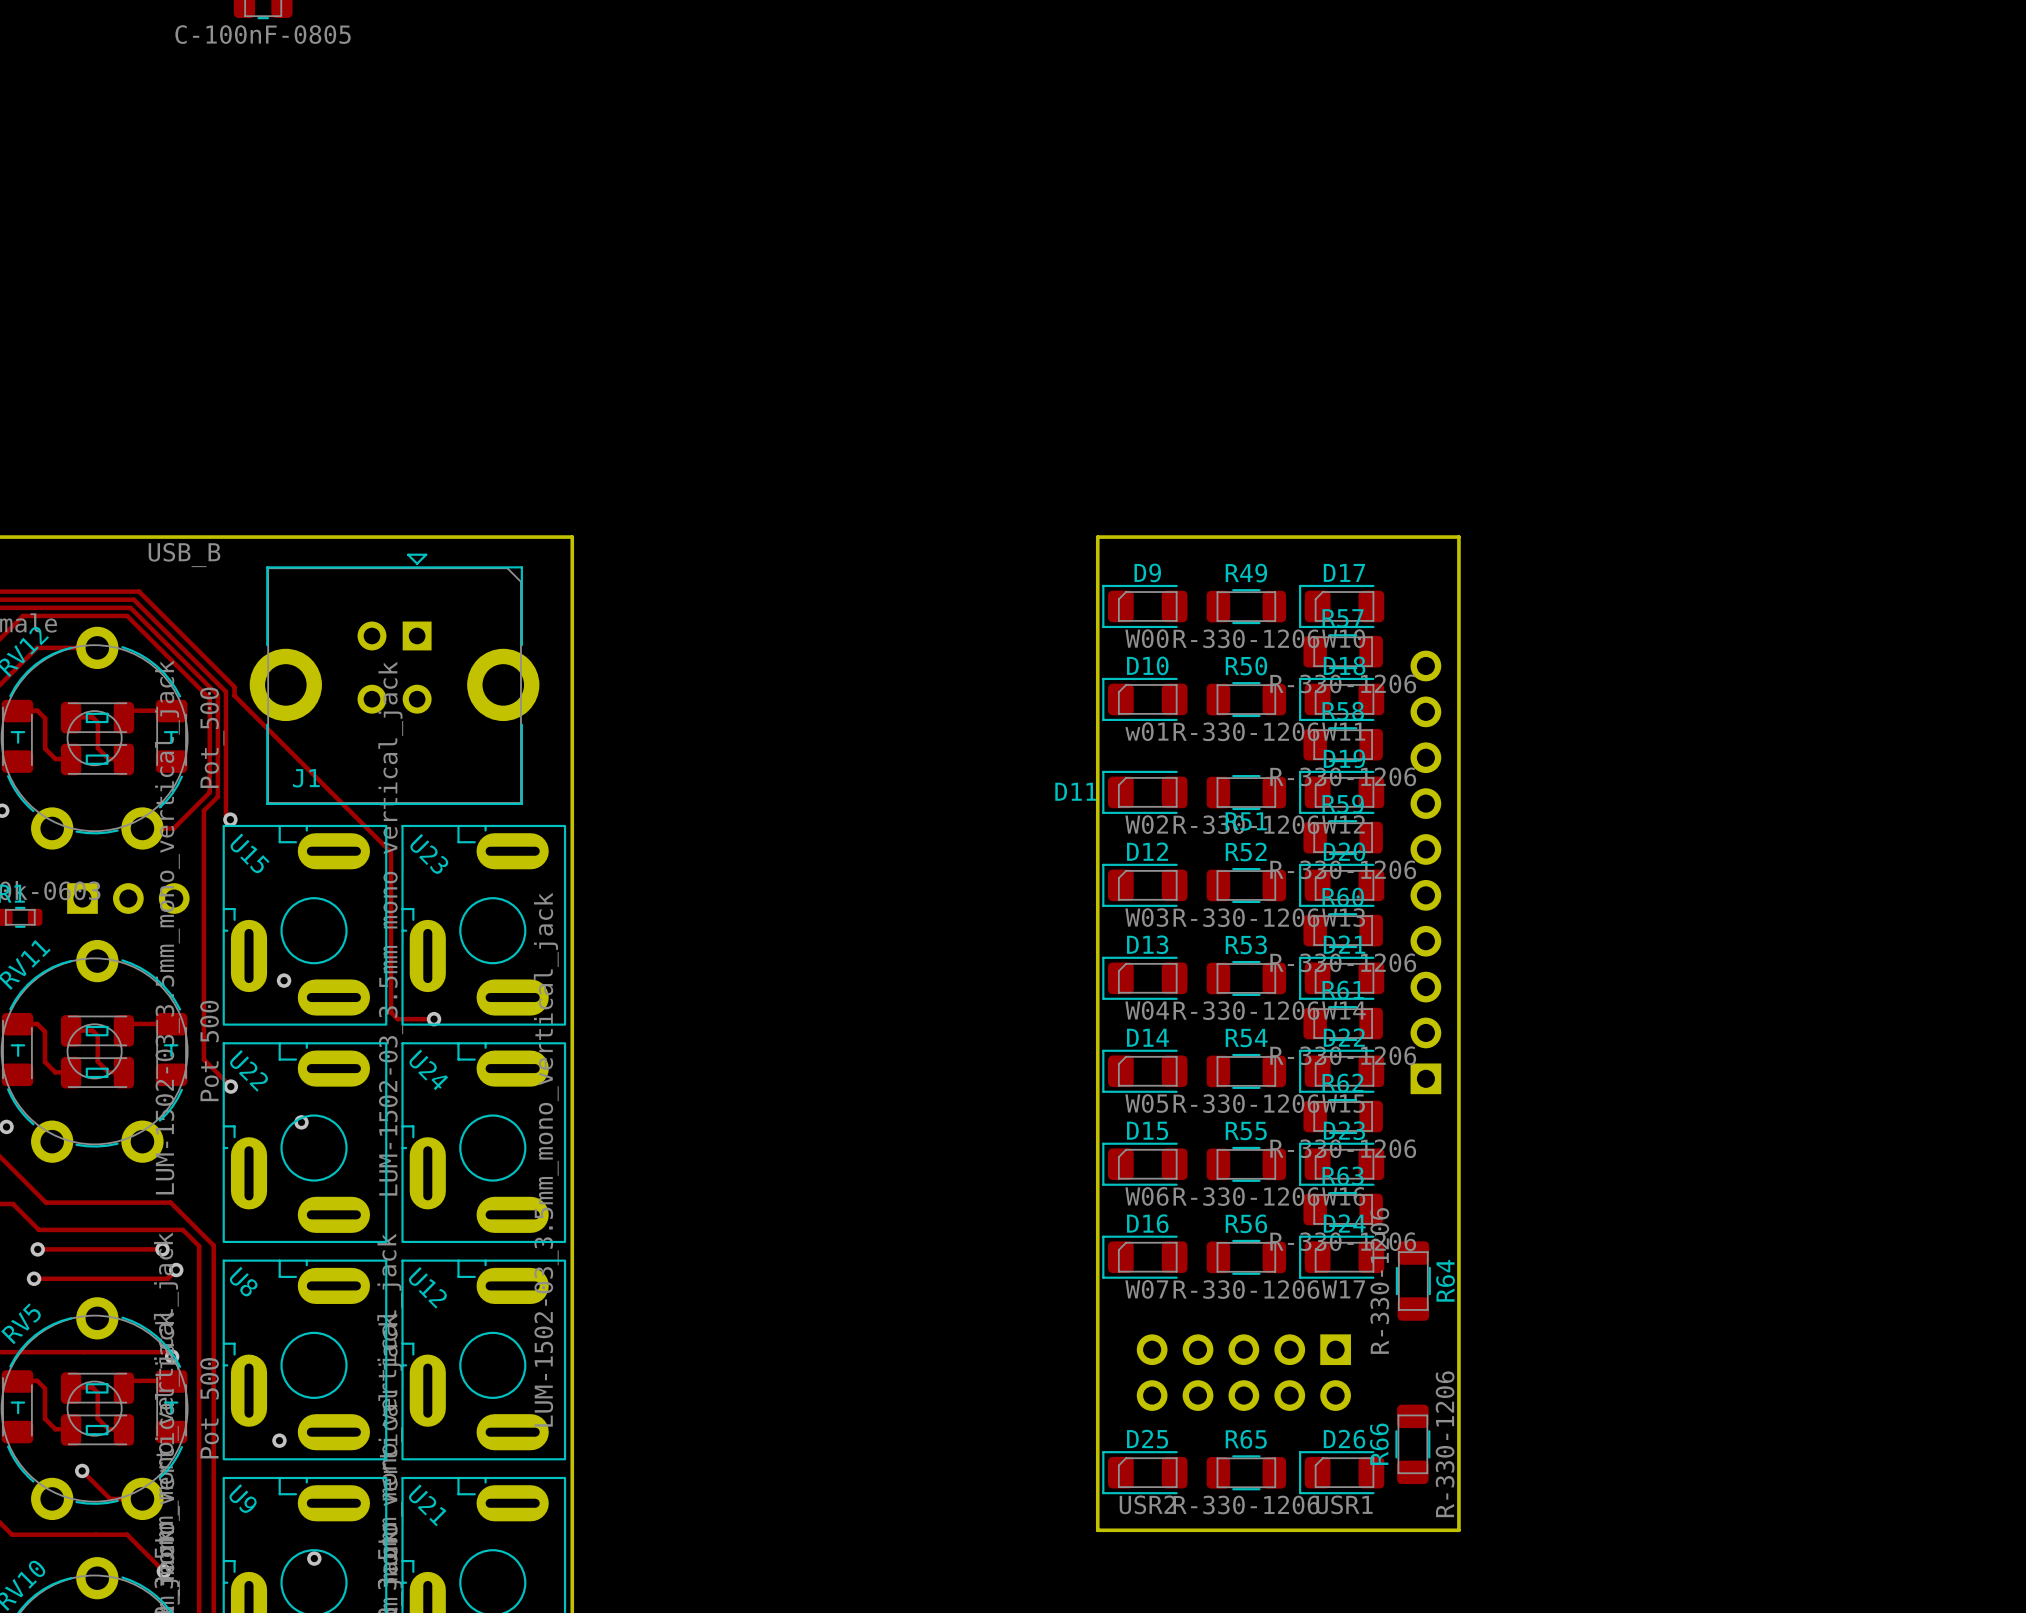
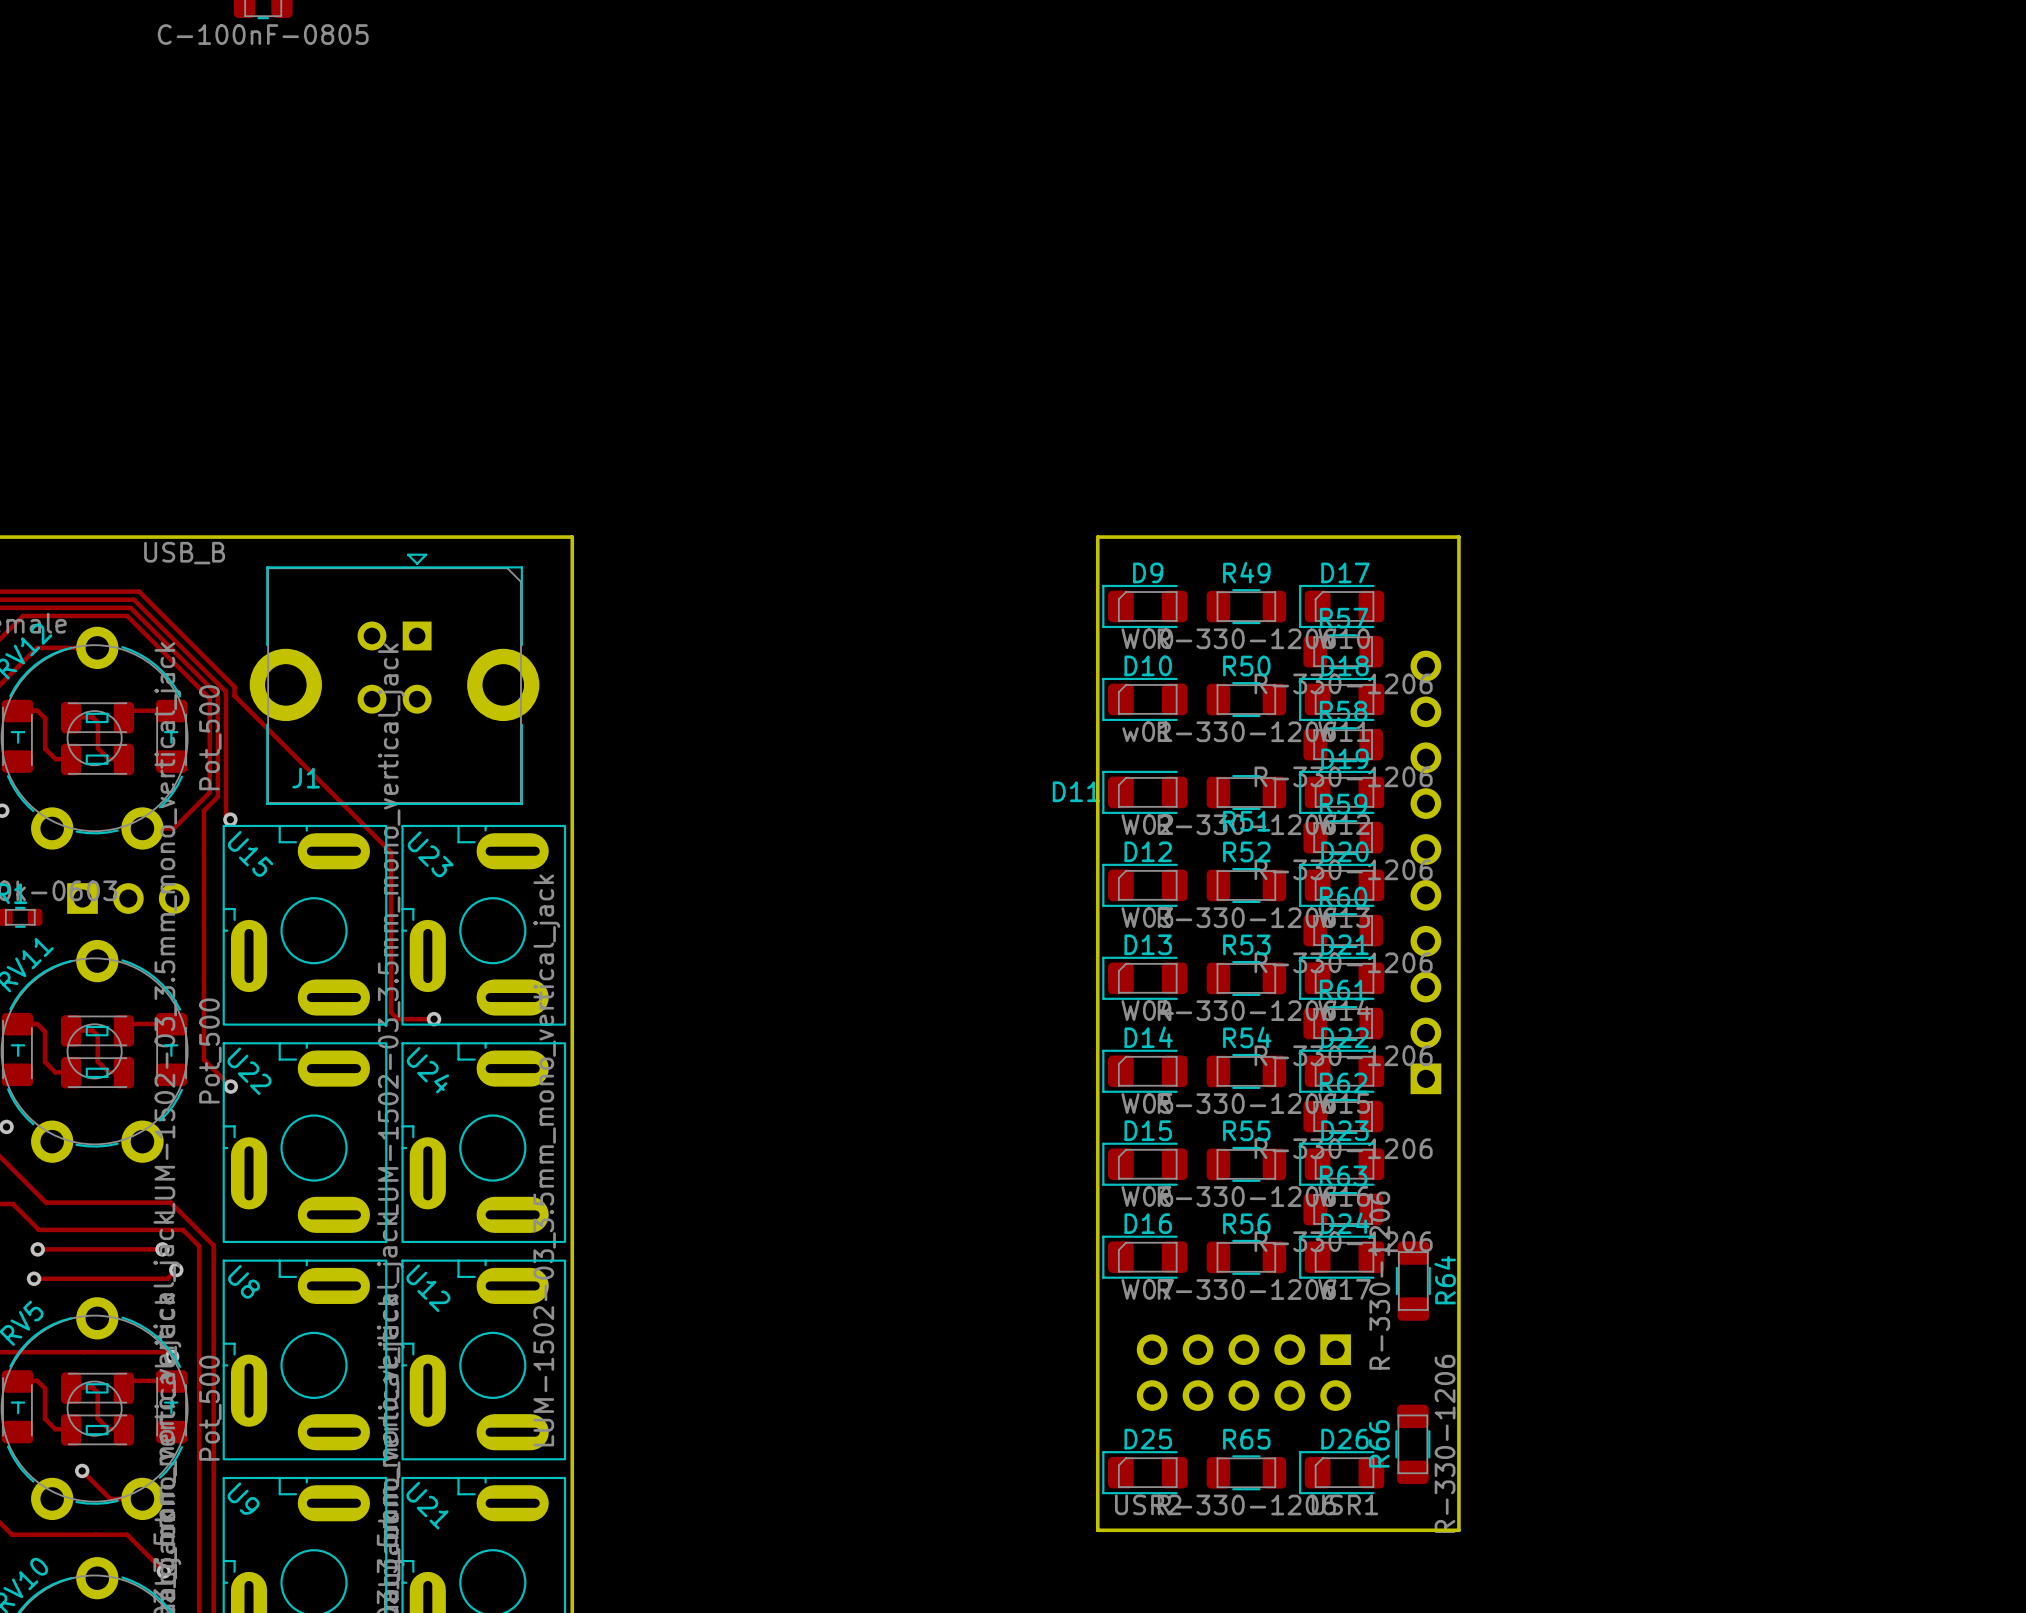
via: (284, 980) -> none
via: (301, 1122) -> none
via: (279, 1440) -> none
via: (314, 1558) -> none

